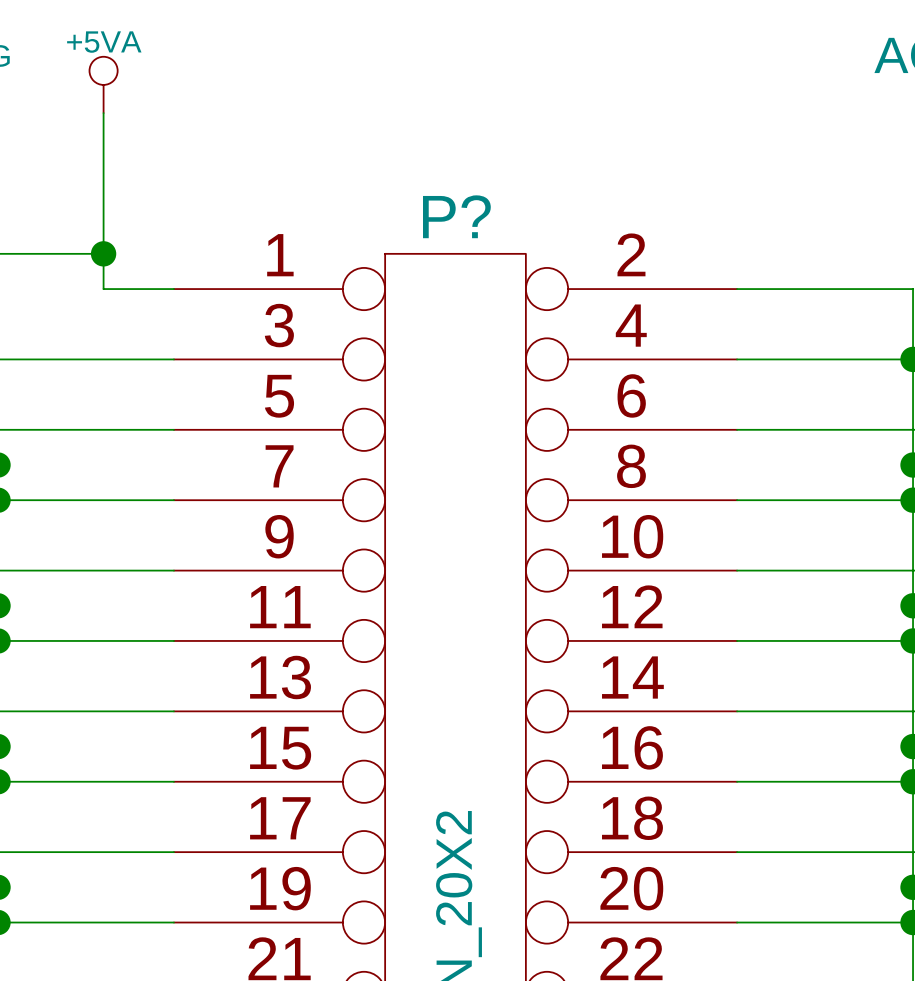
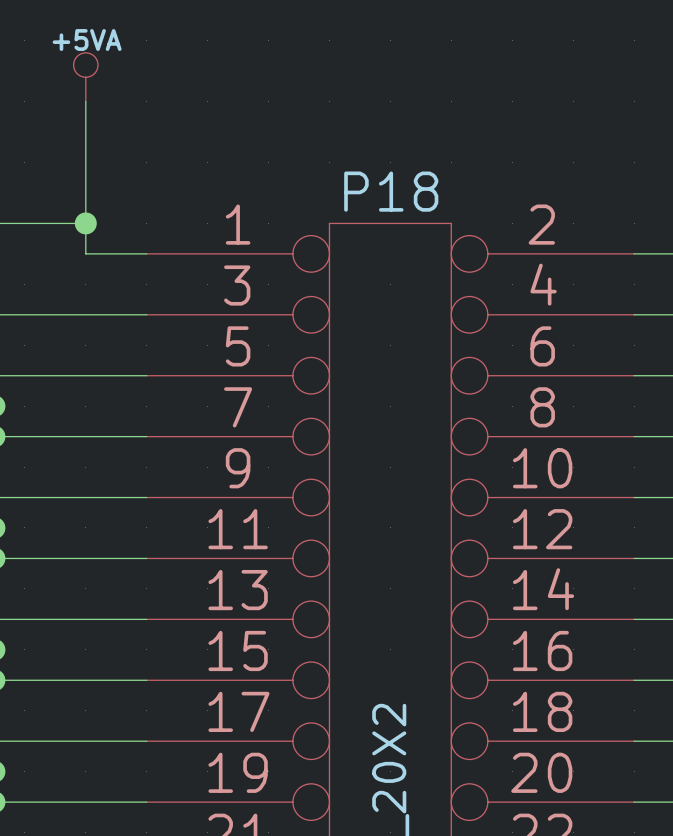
P? name: P? (456, 216) -> P18 (391, 191)

